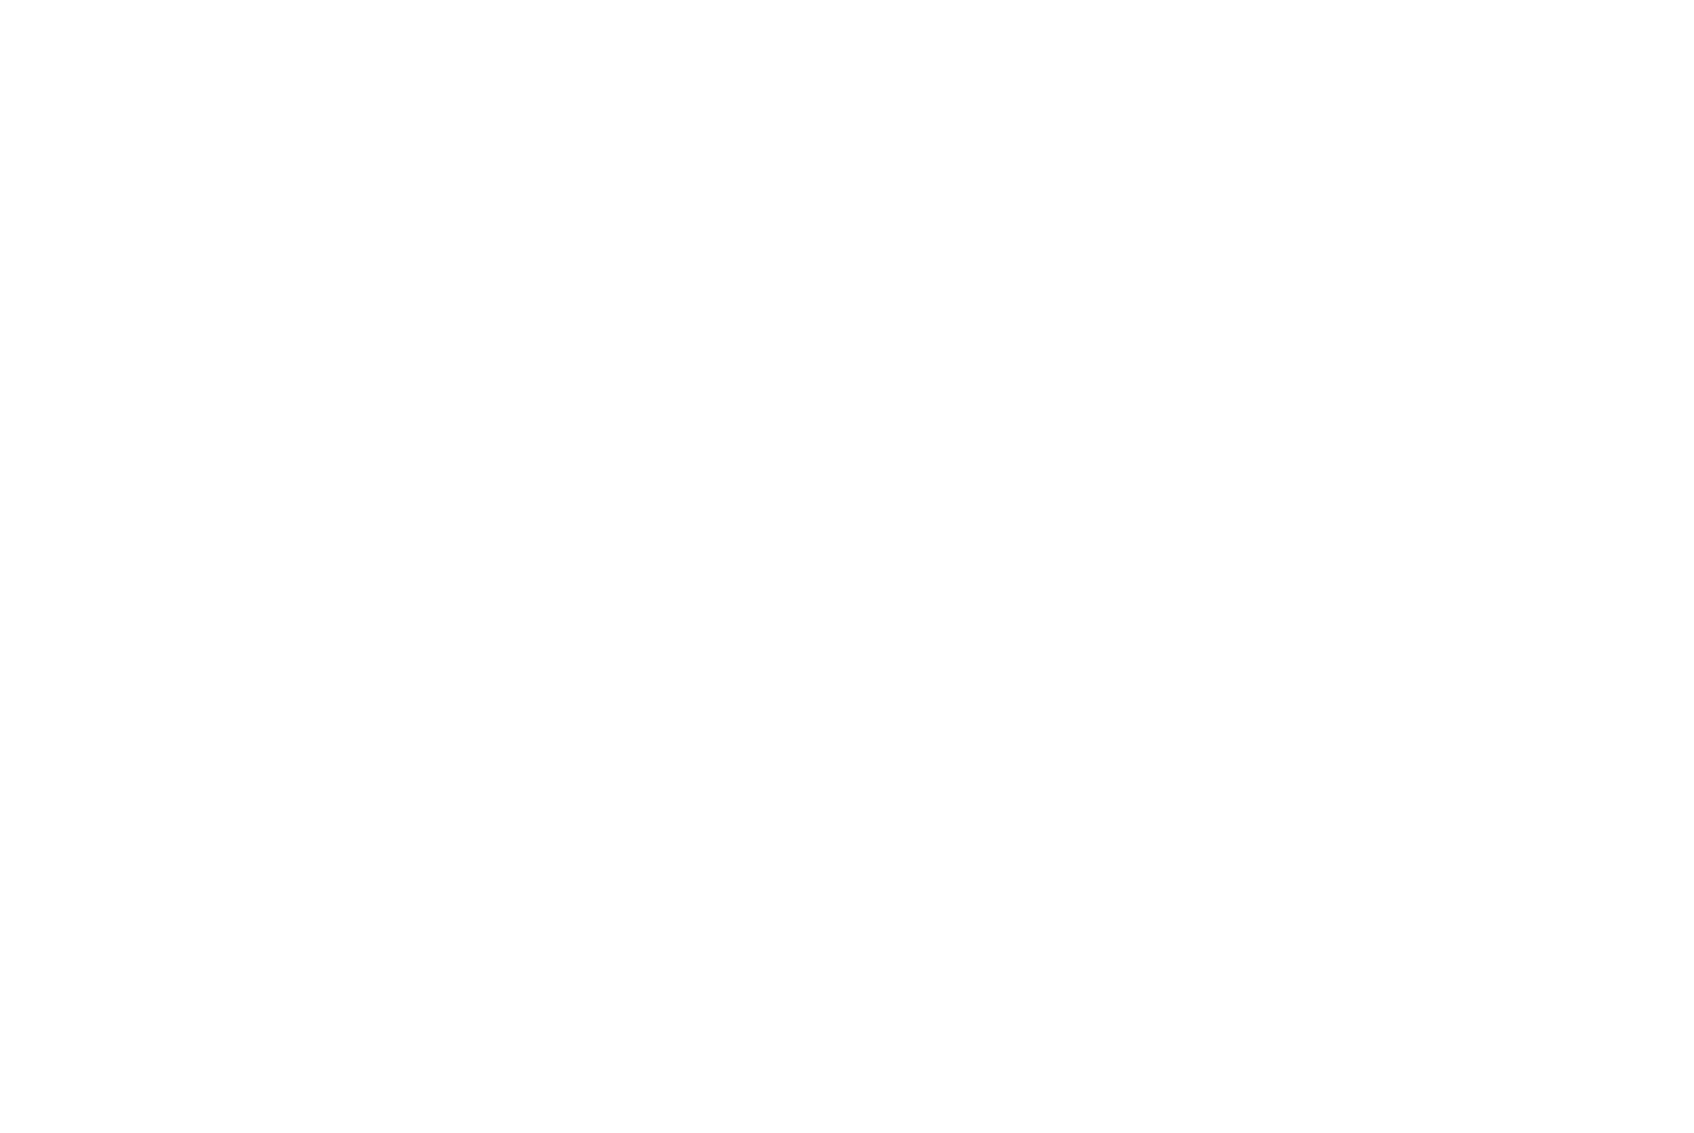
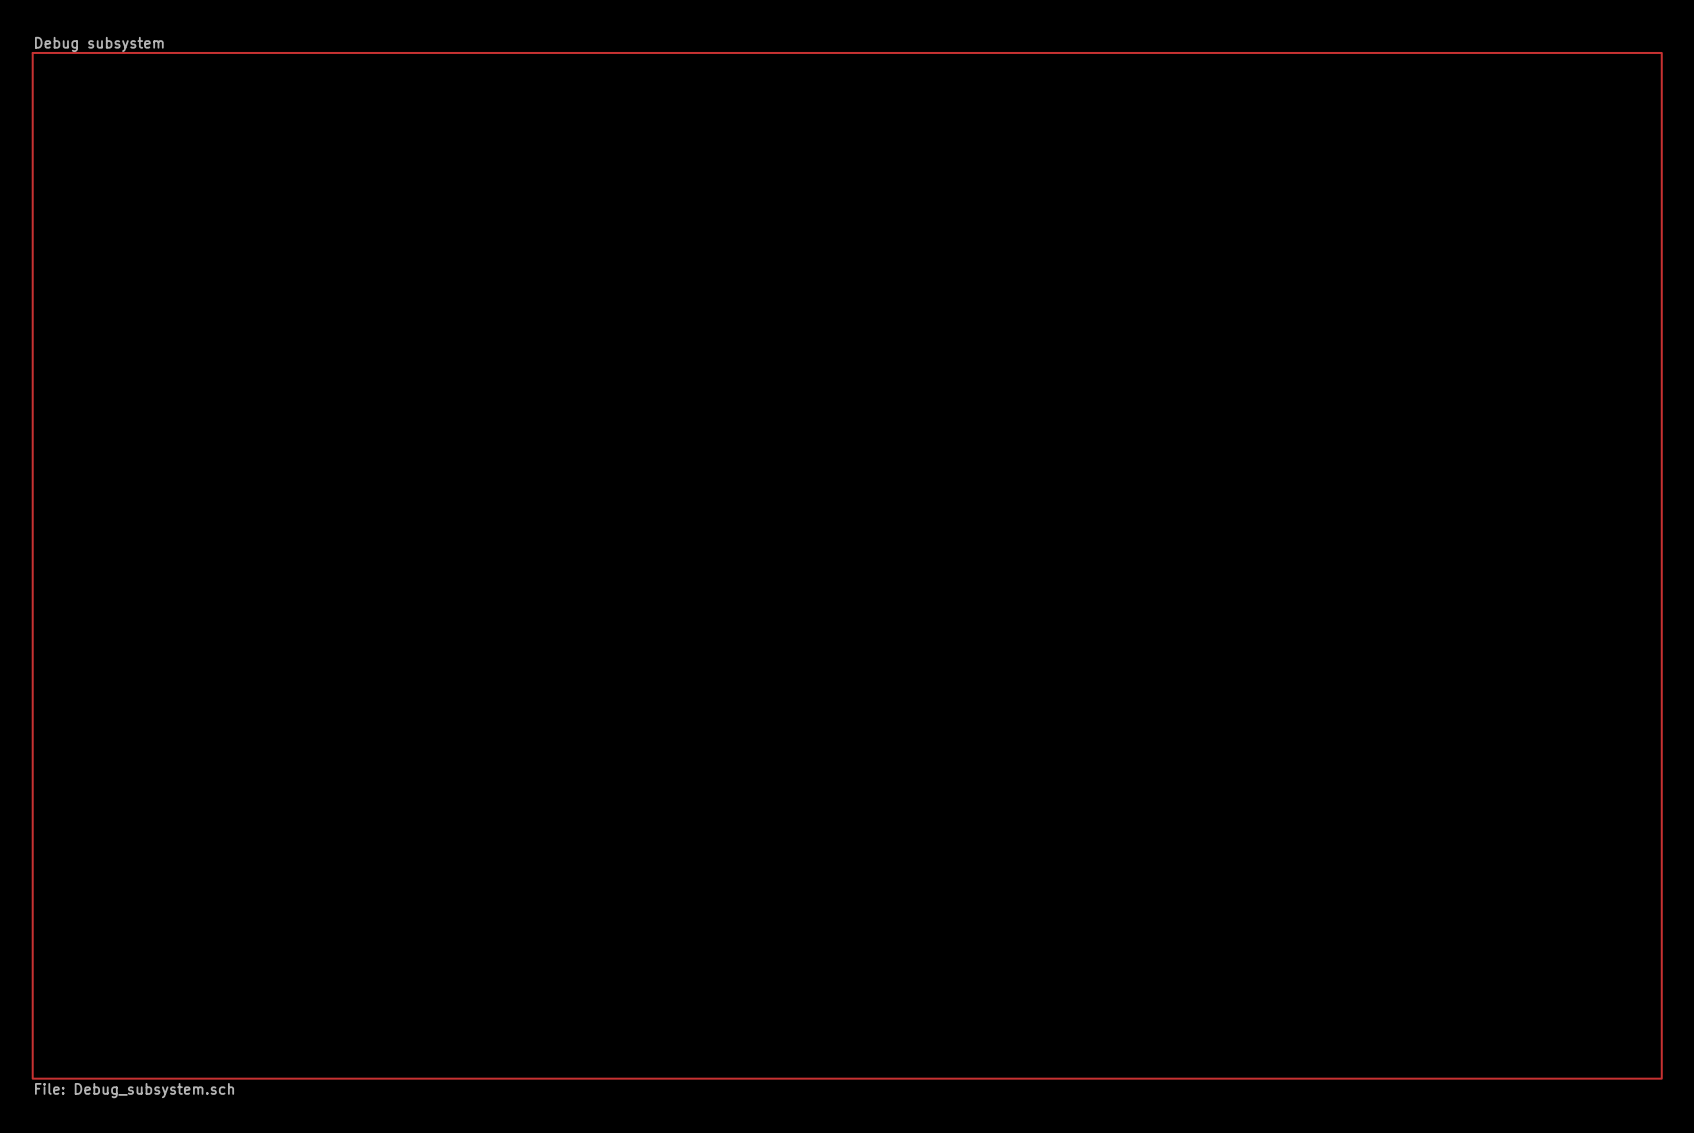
sheet Debug subsystem: none -> File: Debug_subsystem.sch (847, 565)

